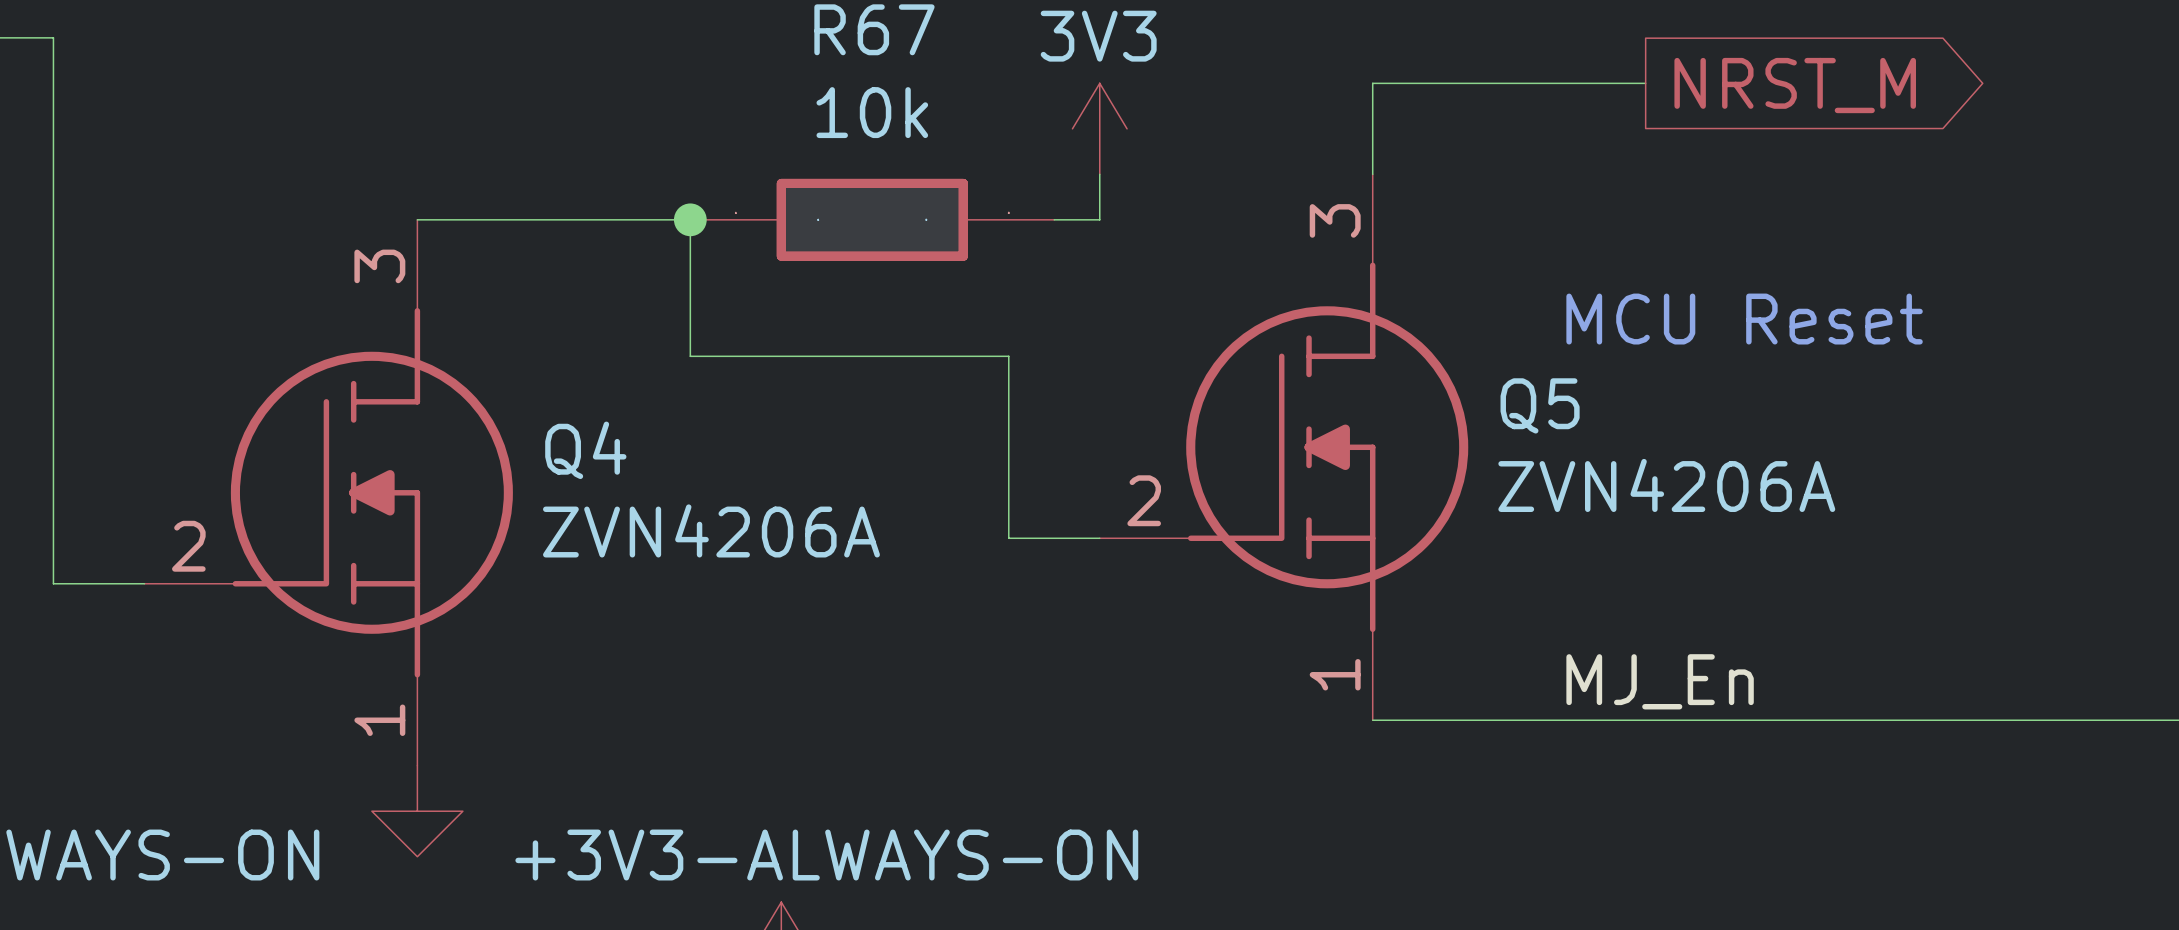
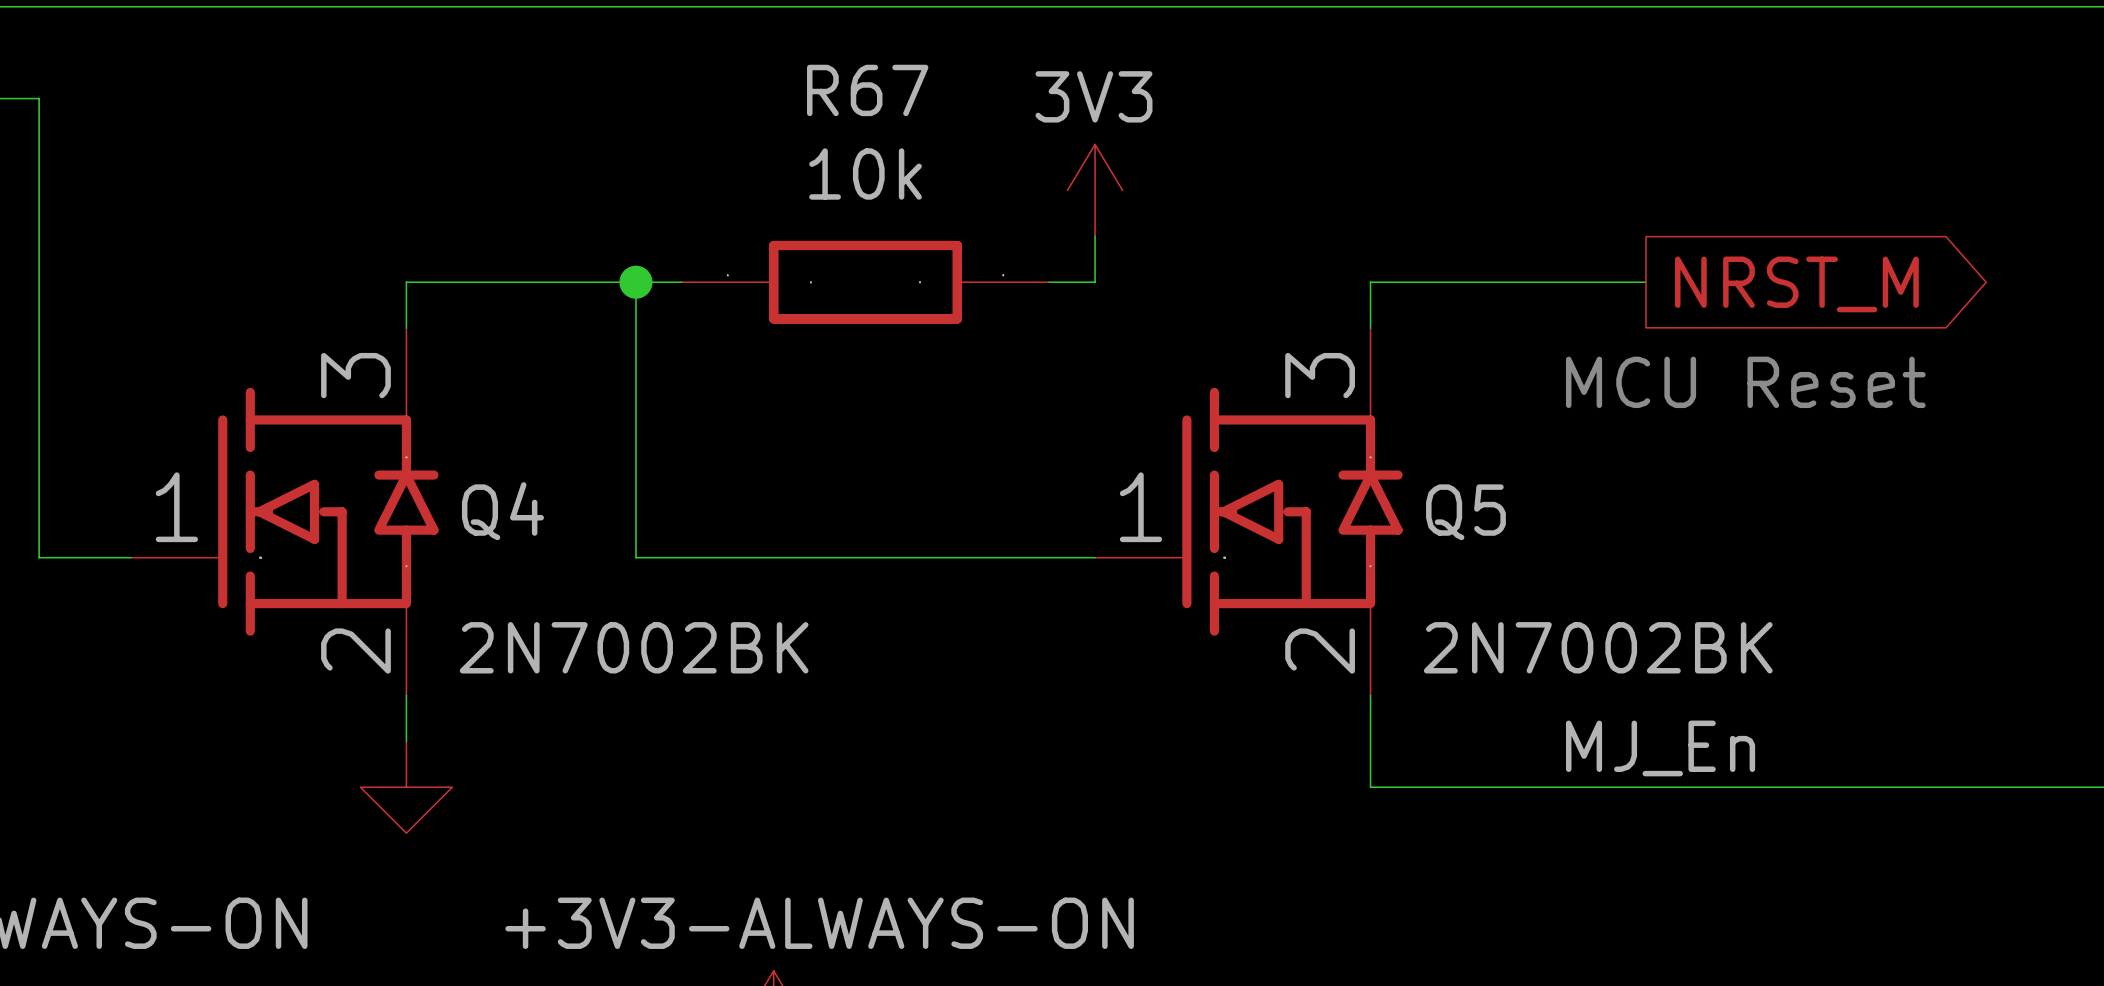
wire: (1645, 83) (1372, 83) (1372, 174) -> none
global label position: NRST_M (1795, 85) -> NRST_M (1796, 284)
Q5 symbol: [1099, 174, 1469, 721] -> [1095, 328, 1403, 696]
Q4 symbol: [144, 219, 513, 766] -> [130, 328, 439, 696]
wire: none -> (635, 282) (635, 557) (1095, 557)
wire: (690, 219) (690, 356) (1008, 356) (1008, 538) (1099, 538) -> none
junction position: (690, 219) -> (635, 282)
wire: none -> (1645, 282) (1370, 282) (1370, 328)
Q5 value: ZVN4206A (1666, 485) -> 2N7002BK (1598, 647)
wire: (53, 492) (53, 583) (144, 583) -> (39, 557) (130, 557)
Q4 value: ZVN4206A (711, 530) -> 2N7002BK (634, 647)
power symbol position: (417, 811) -> (406, 787)

